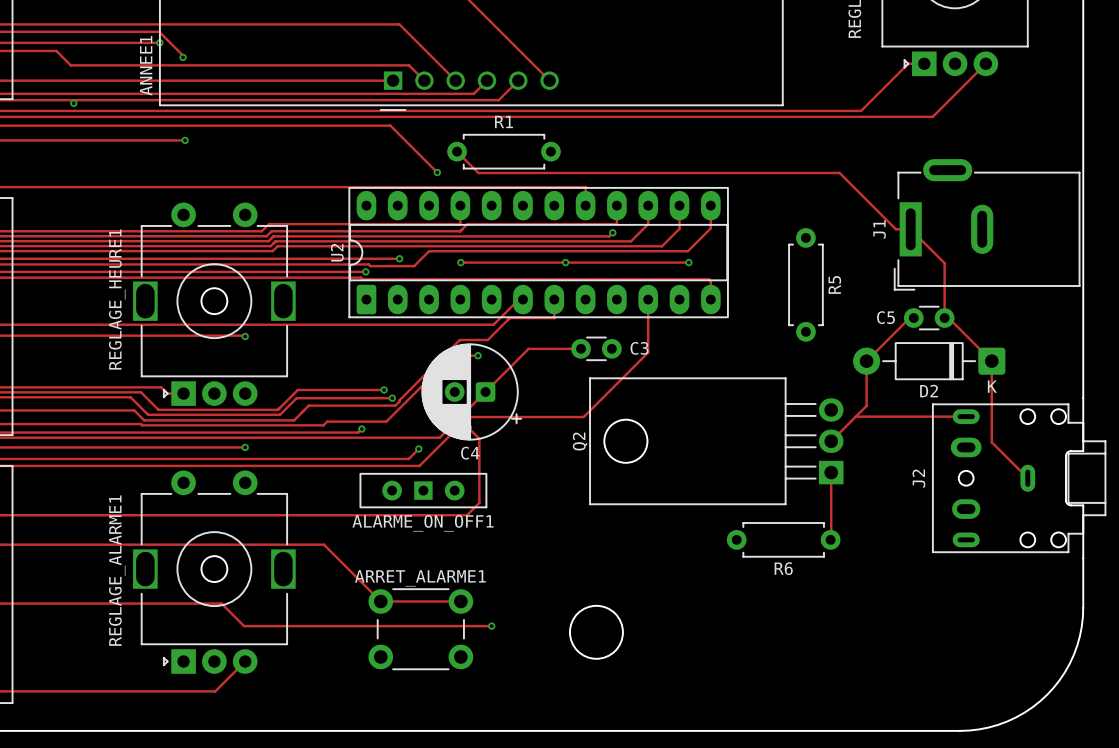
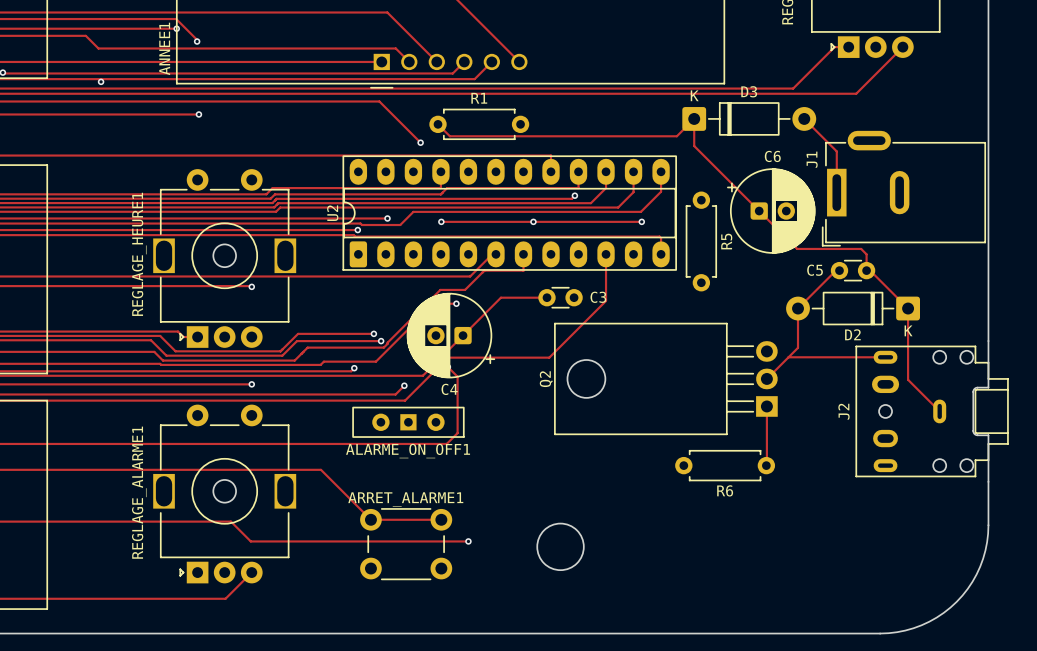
D3: none -> (749, 118)
track: none -> (804, 118) (836, 151) (836, 192)
track: (470, 165) (478, 172) (839, 172) (895, 229) (910, 229) (944, 263) (944, 299) -> (449, 136) (676, 136) (694, 118) (694, 146) (797, 248) (861, 248) (866, 254)
J1 name position: J1 (879, 229) -> J1 (812, 159)
C6: none -> (771, 211)
R5 position: (805, 284) -> (701, 241)

